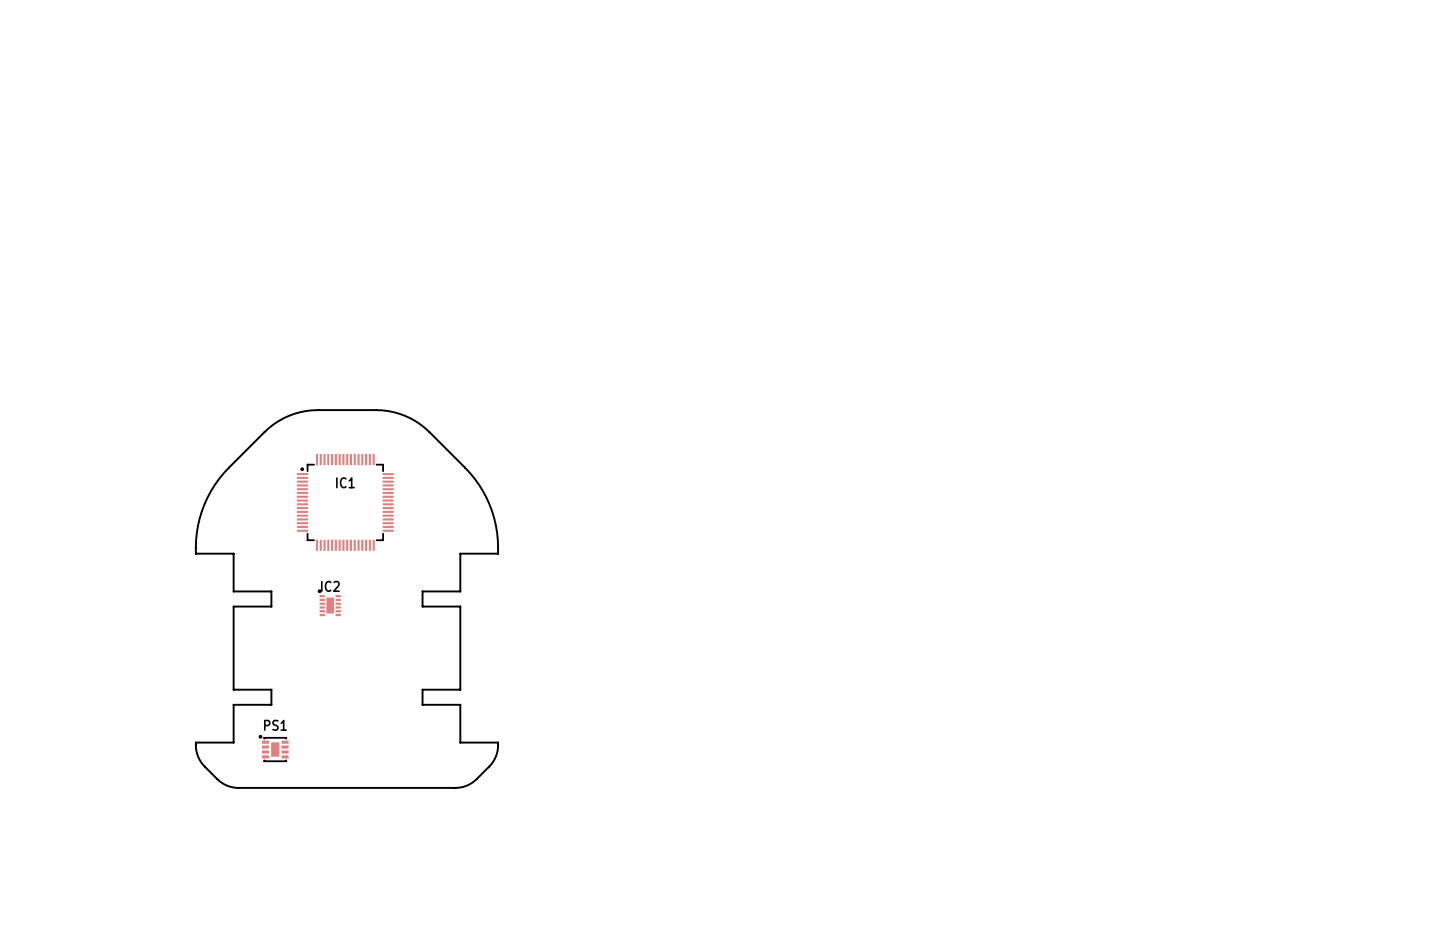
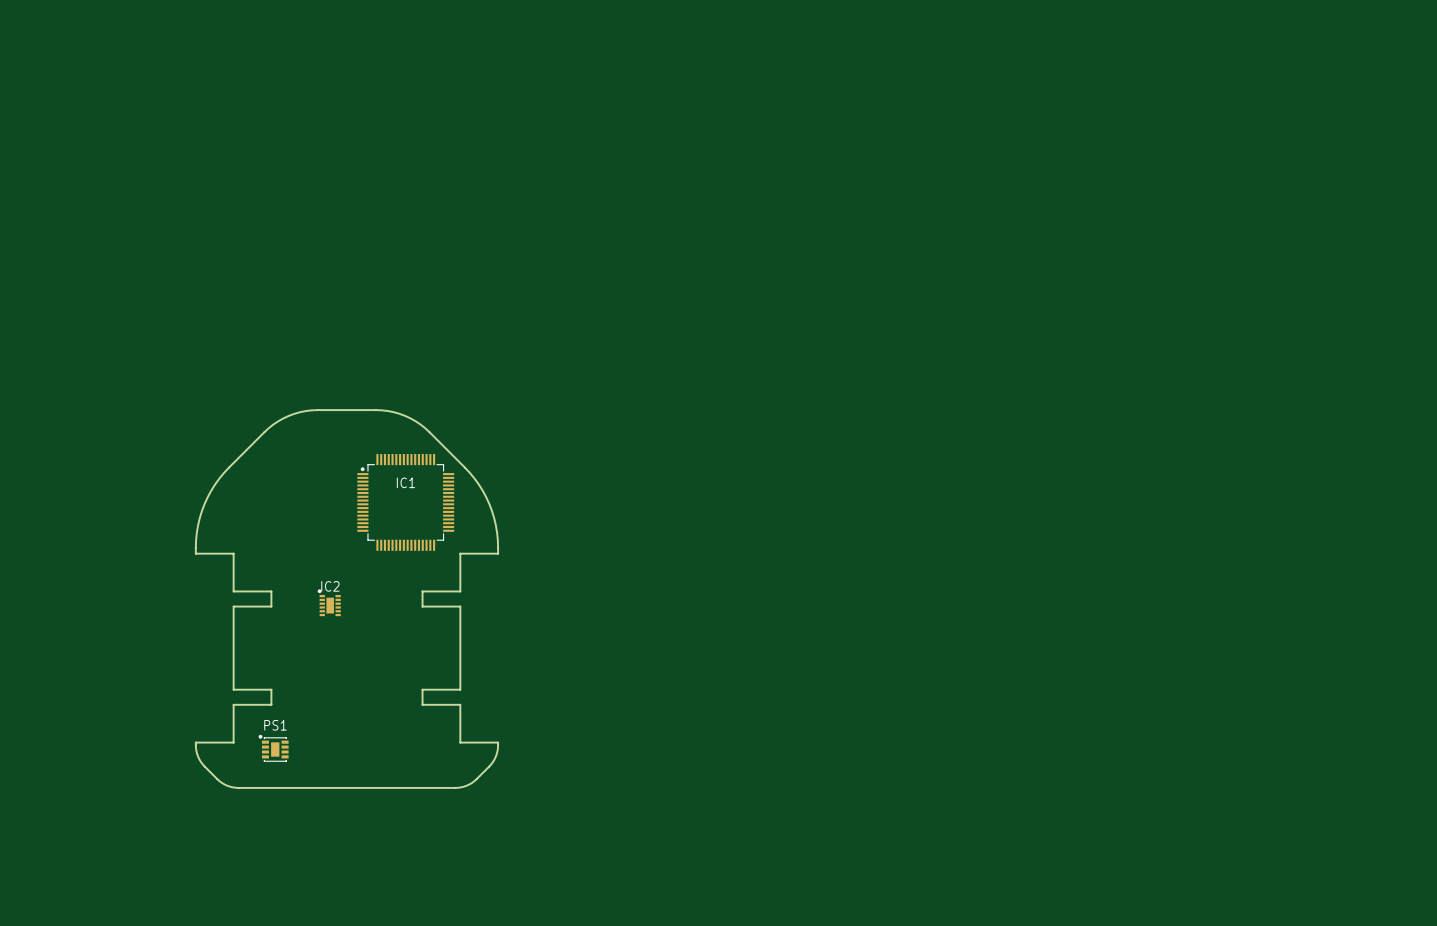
IC1 position: (345, 502) -> (405, 502)

